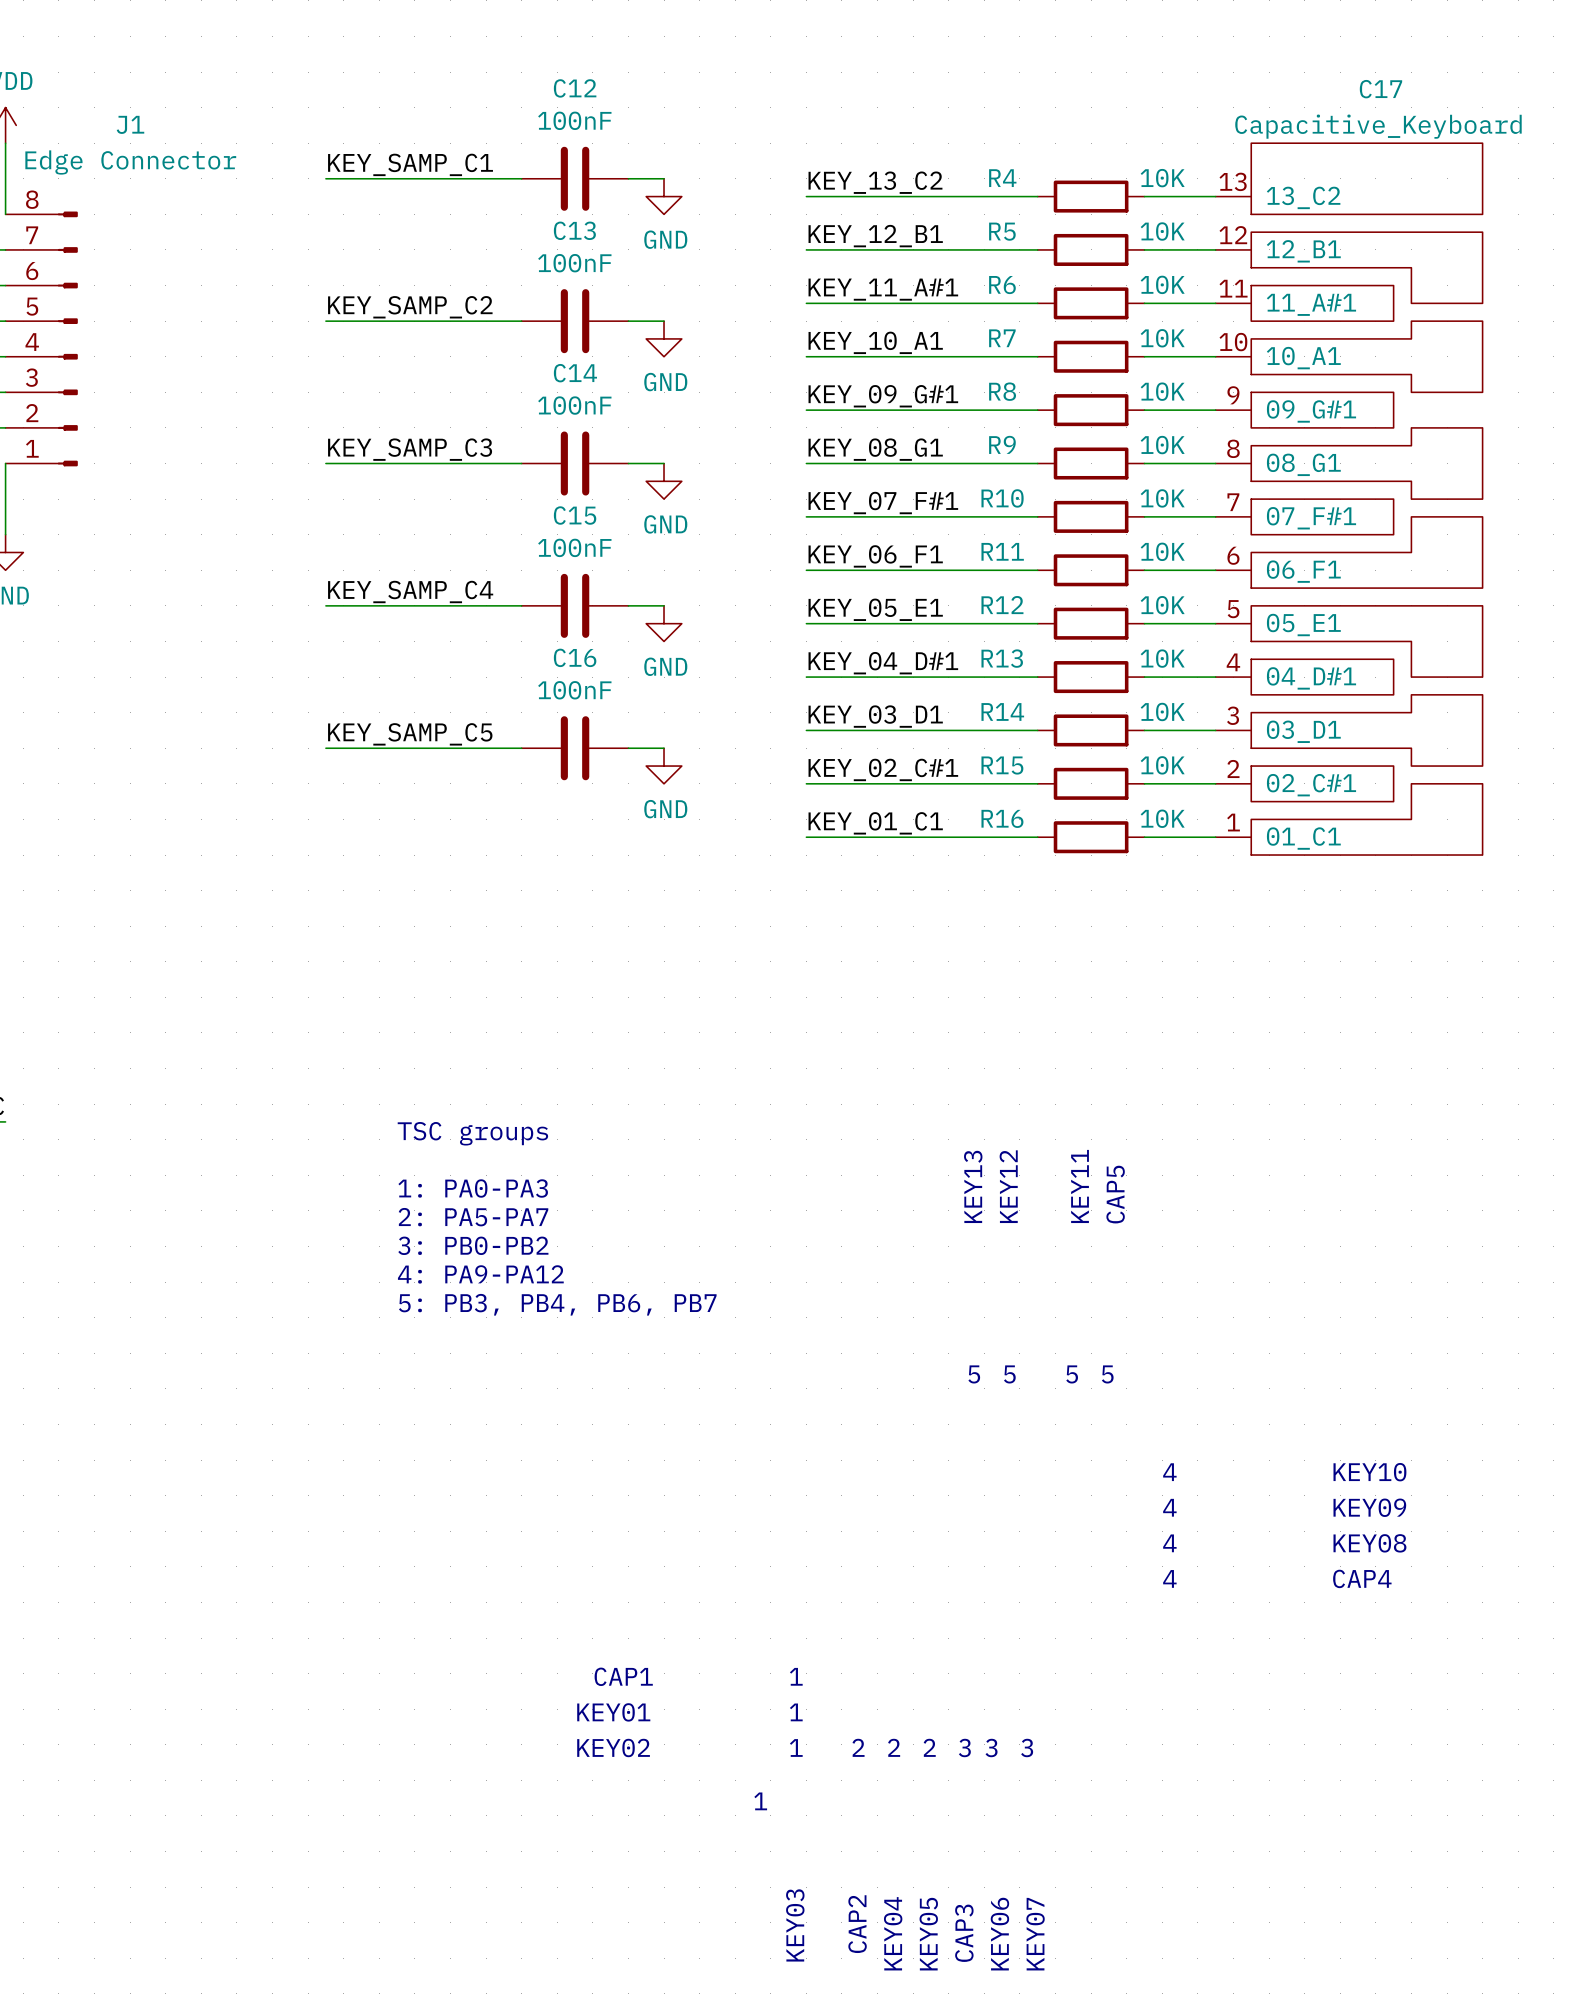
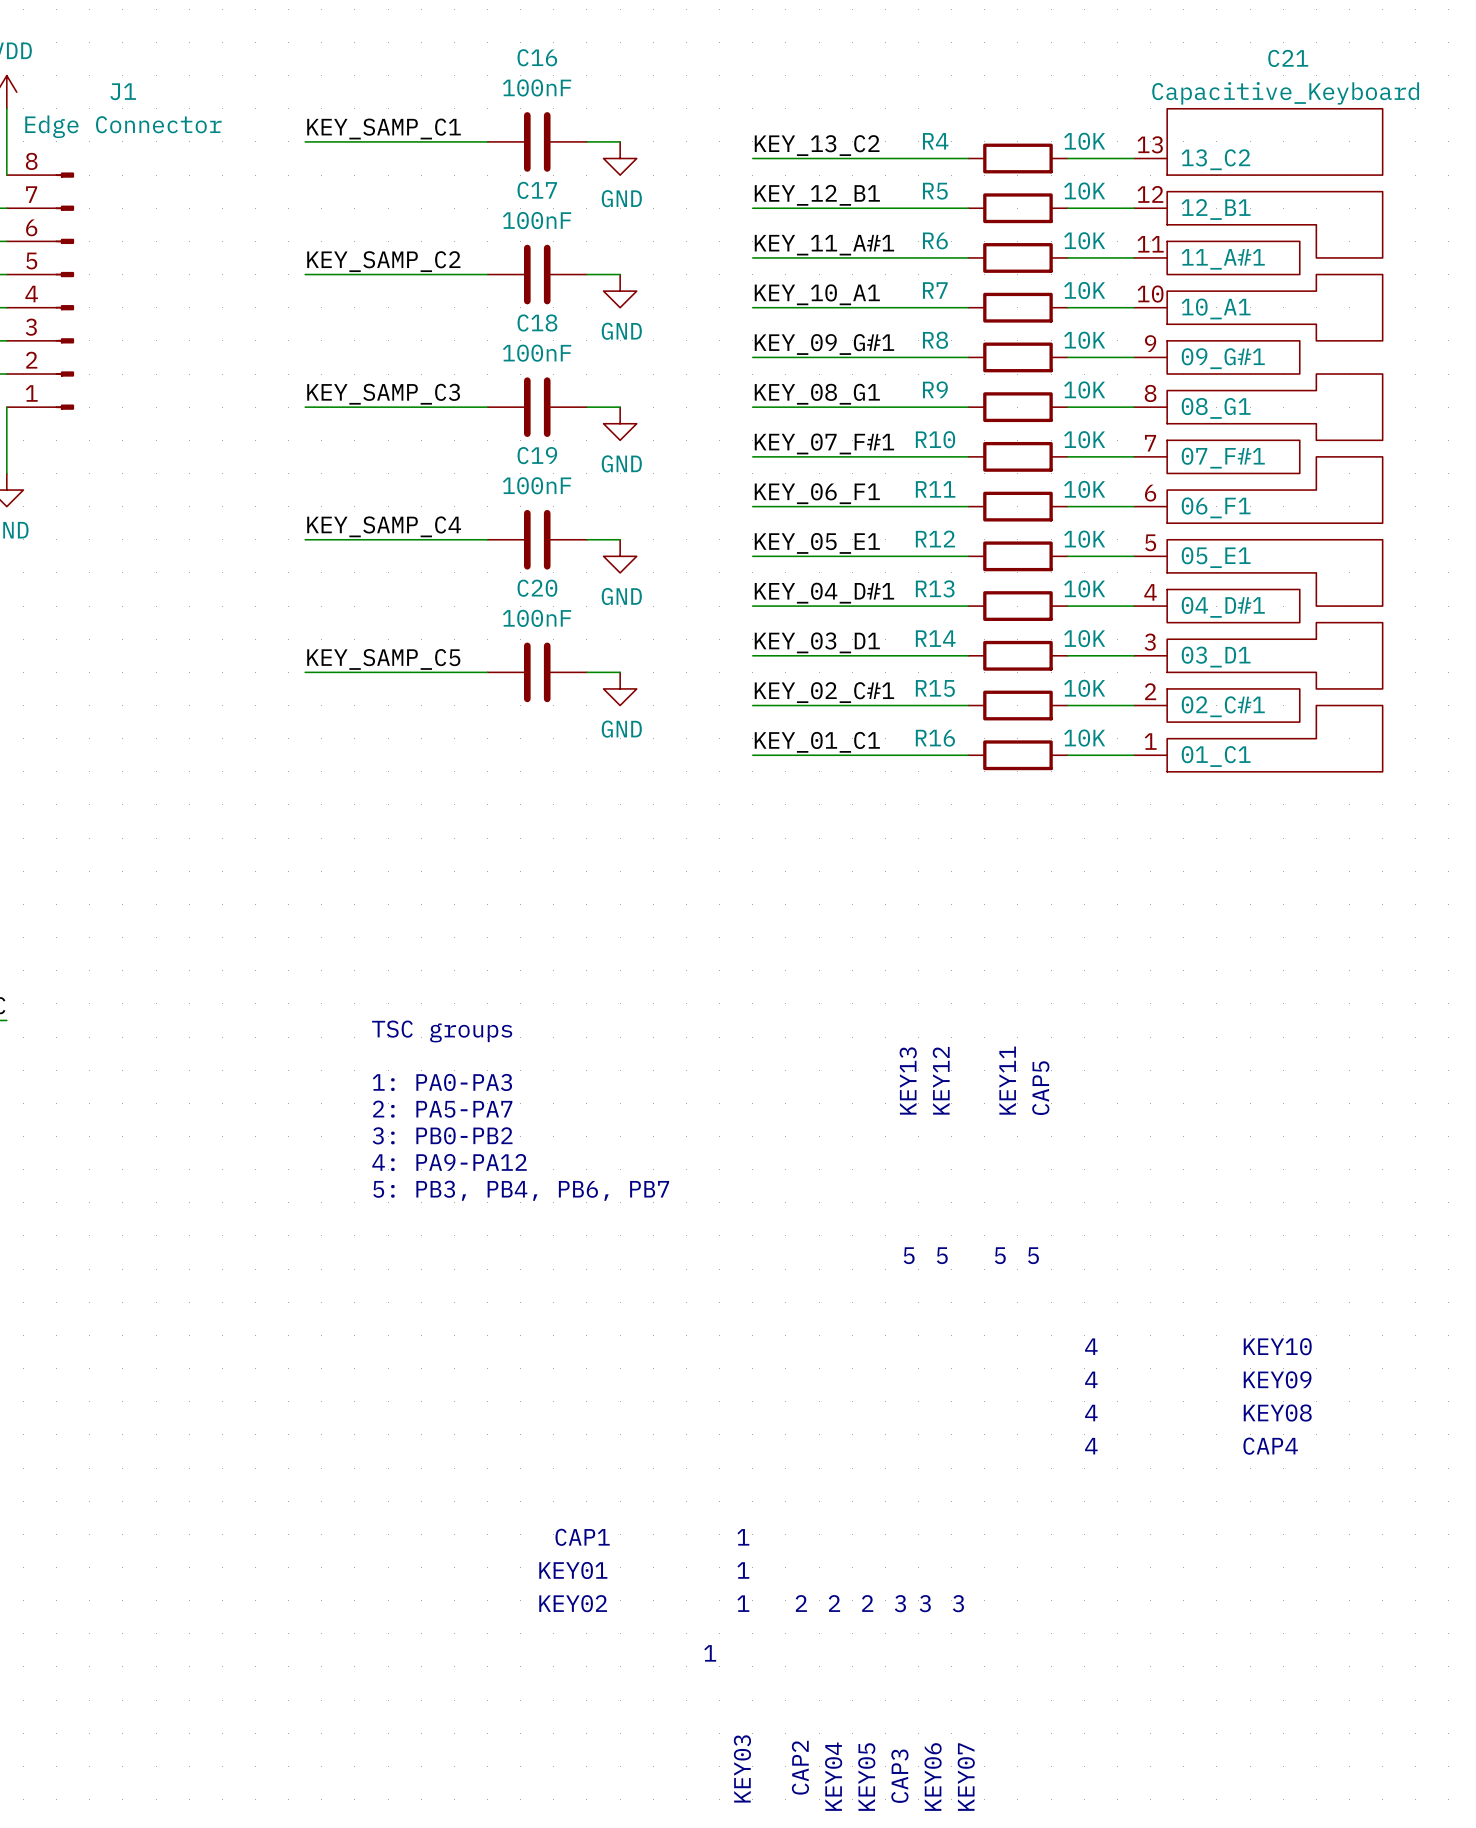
C12 name: C12 (575, 88) -> C16 (537, 57)
C17 name: C17 (1380, 89) -> C21 (1288, 58)
C13 name: C13 (574, 230) -> C17 (537, 190)
C14 name: C14 (575, 373) -> C18 (537, 322)
C15 name: C15 (575, 515) -> C19 (537, 455)
C16 name: C16 (575, 657) -> C20 (537, 588)

